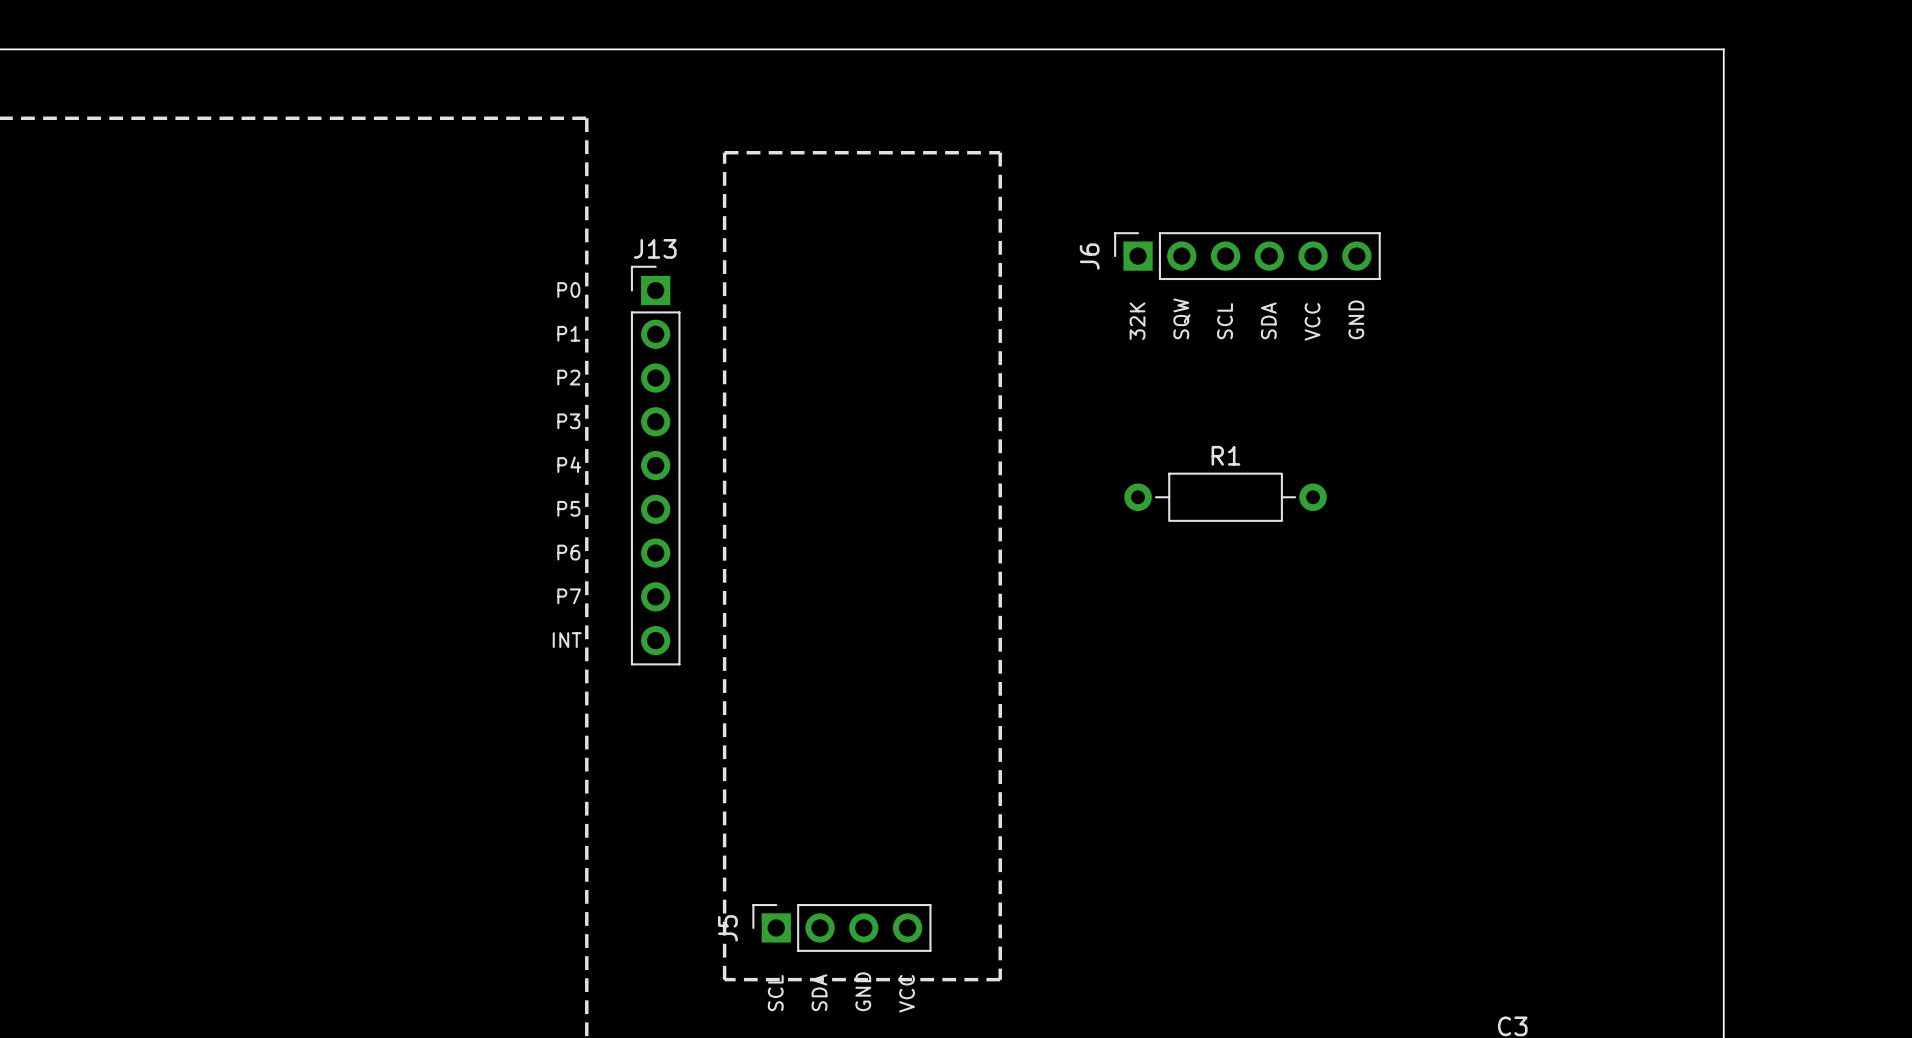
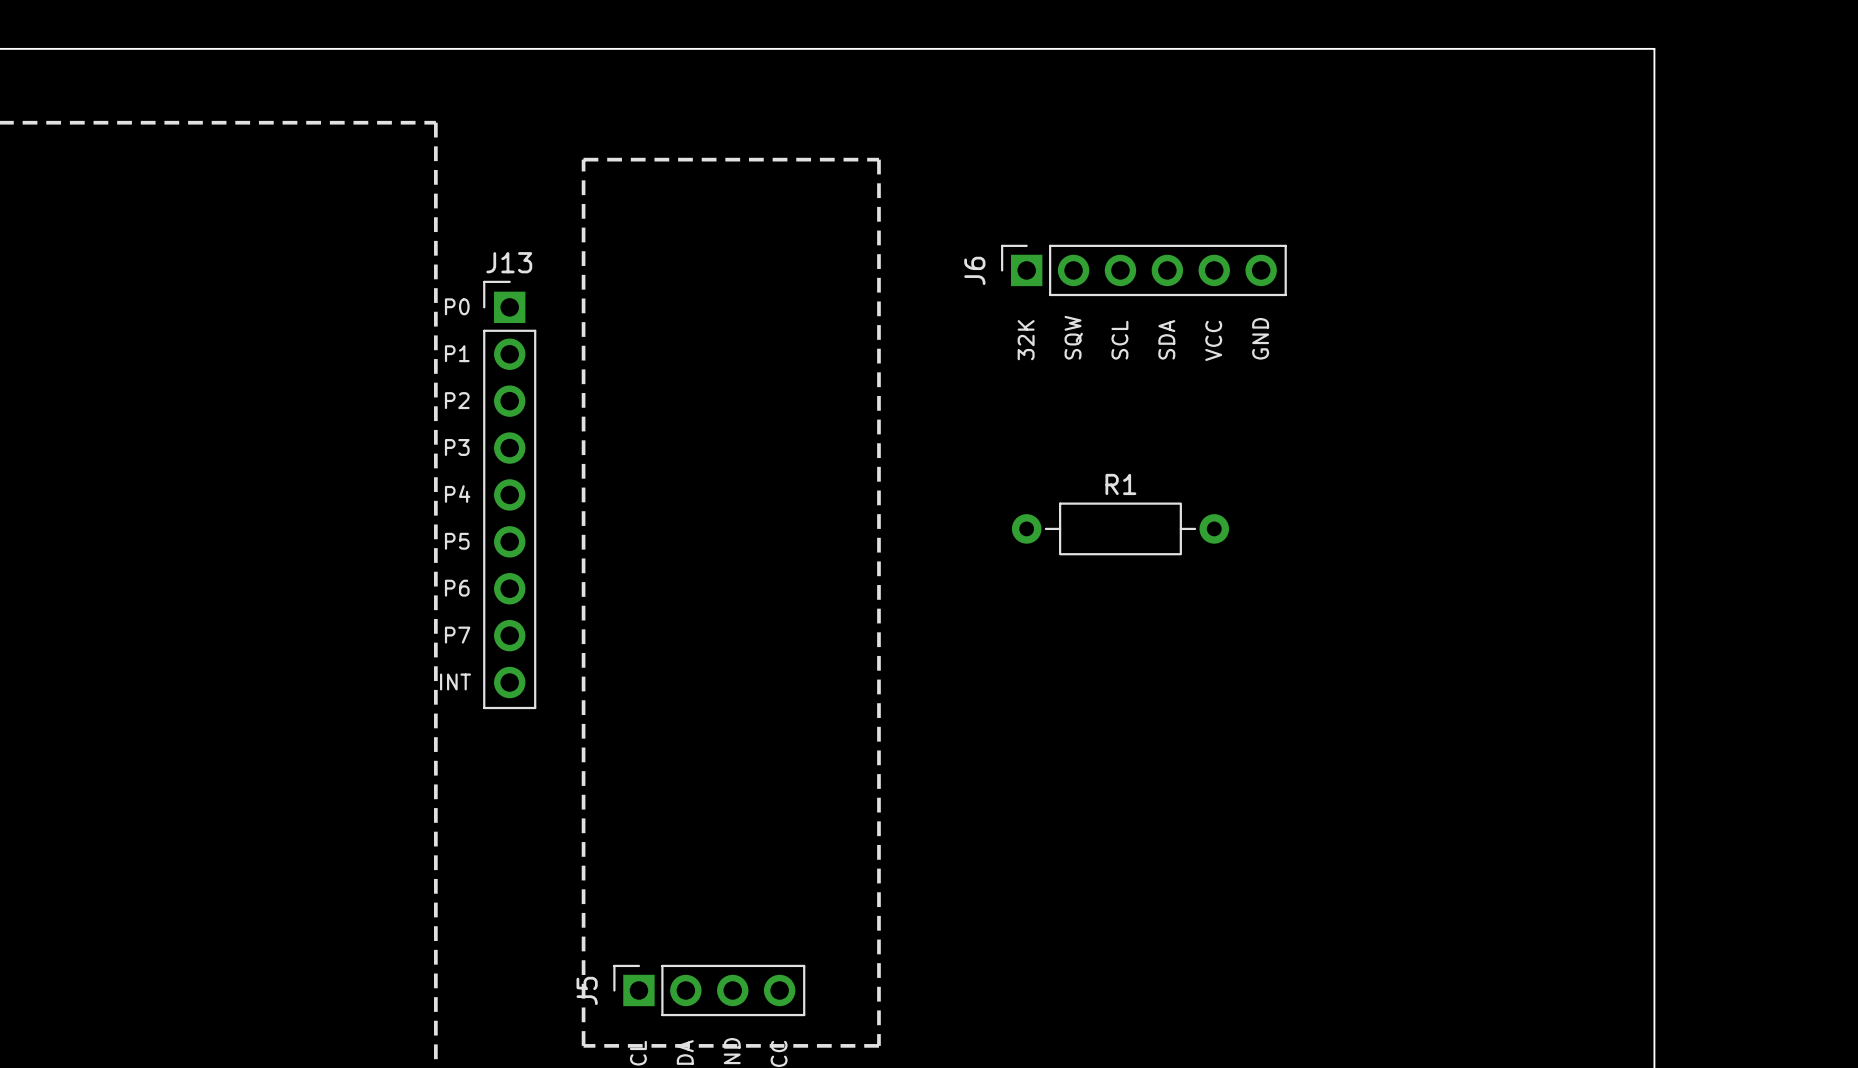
text position: P0 (568, 290) -> P0 (457, 306)
text position: P1 (568, 333) -> P1 (457, 353)
text position: P2 (568, 377) -> P2 (457, 400)
text position: P3 (568, 421) -> P3 (457, 447)
text position: P4 (569, 464) -> P4 (457, 494)
text position: P5 (568, 508) -> P5 (457, 541)
text position: P6 (568, 552) -> P6 (457, 588)
text position: P7 (569, 596) -> P7 (457, 635)
text position: INT (567, 640) -> INT (455, 681)

